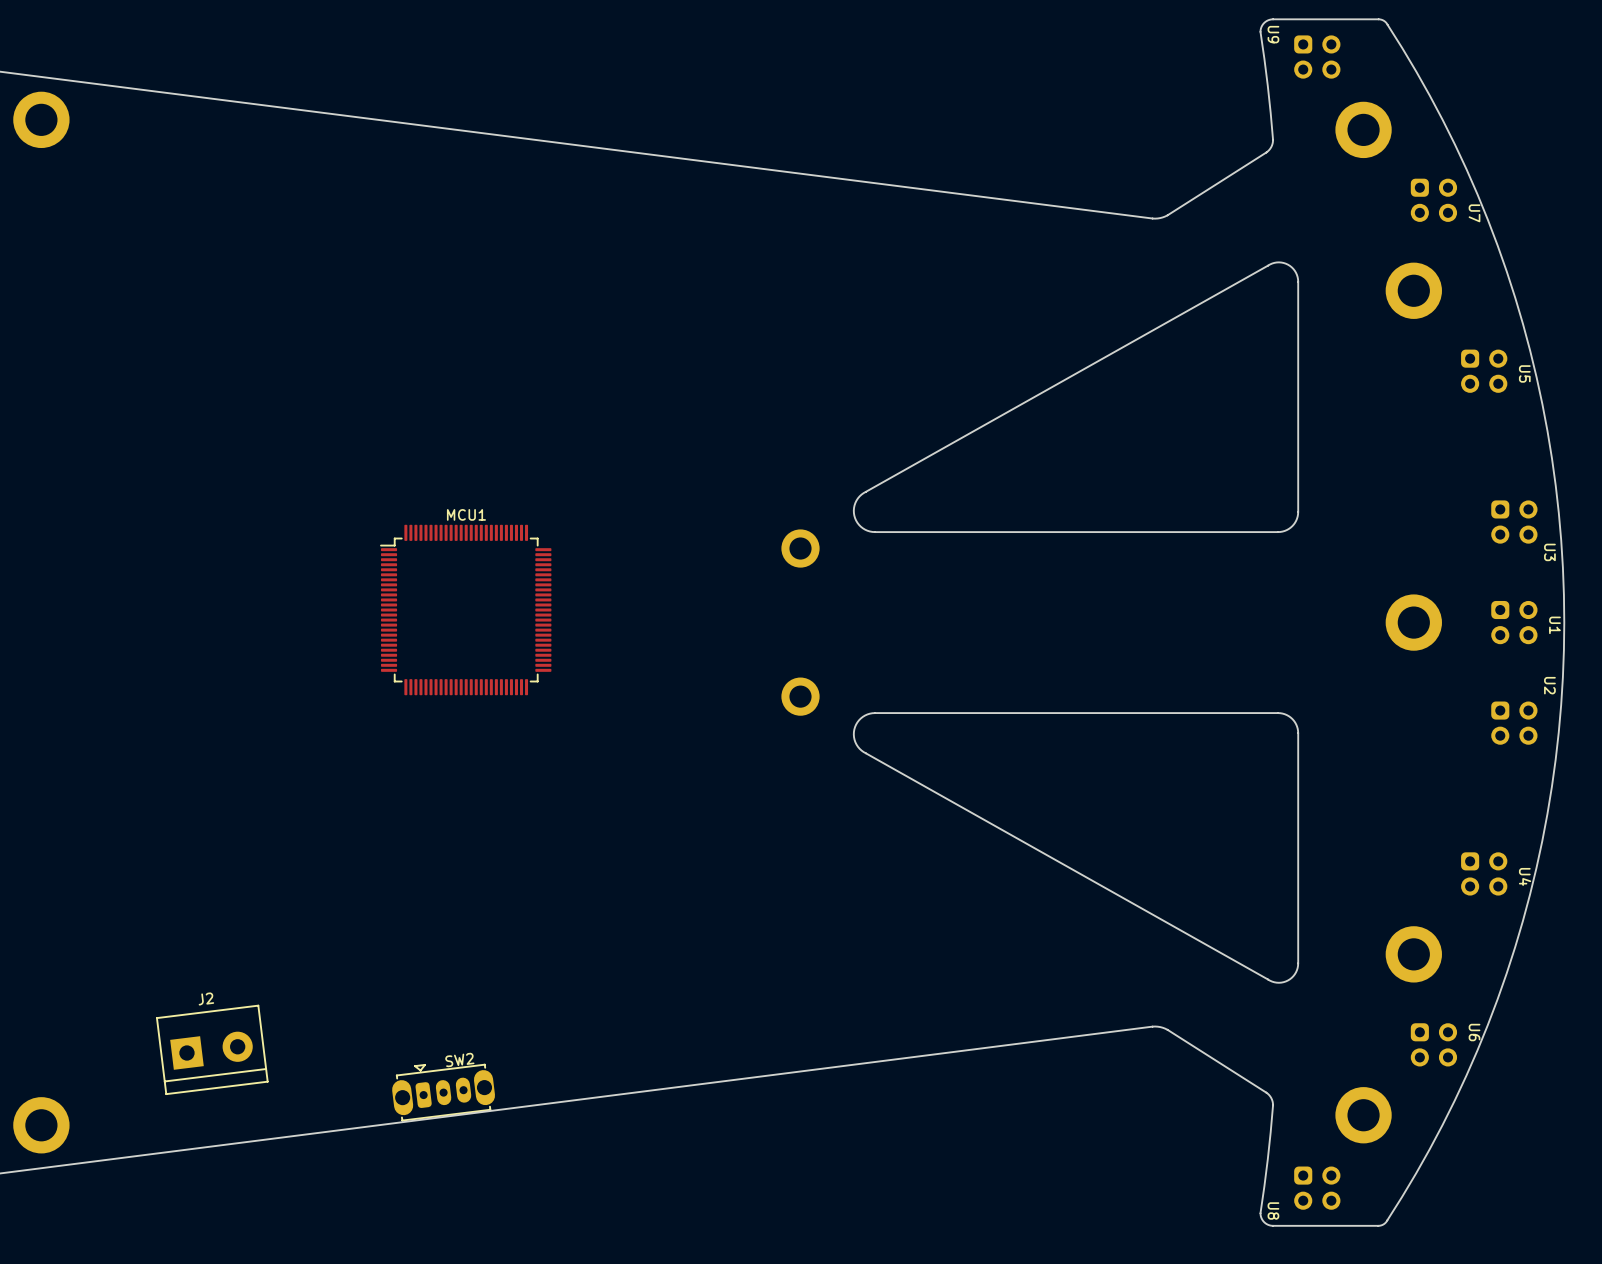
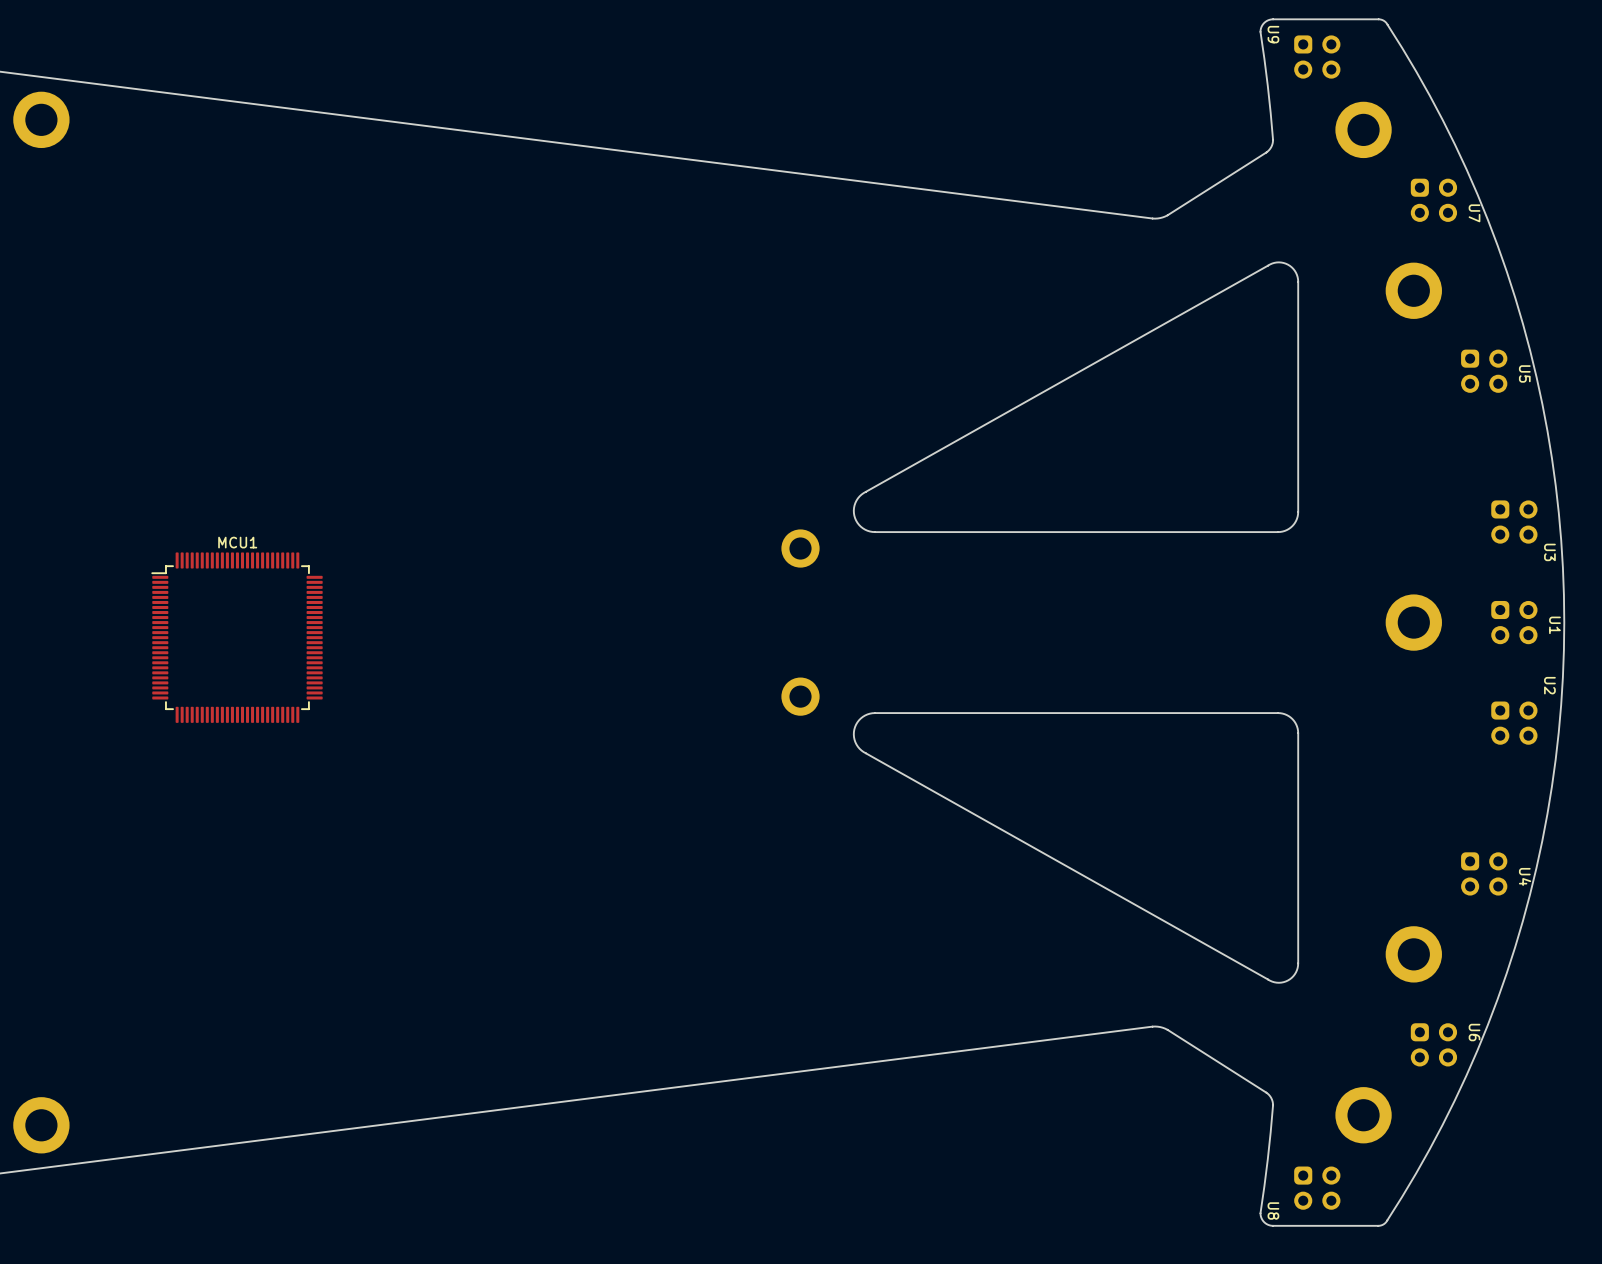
MCU1 position: (465, 610) -> (237, 637)
J2: (212, 1049) -> none
SW2: (443, 1092) -> none

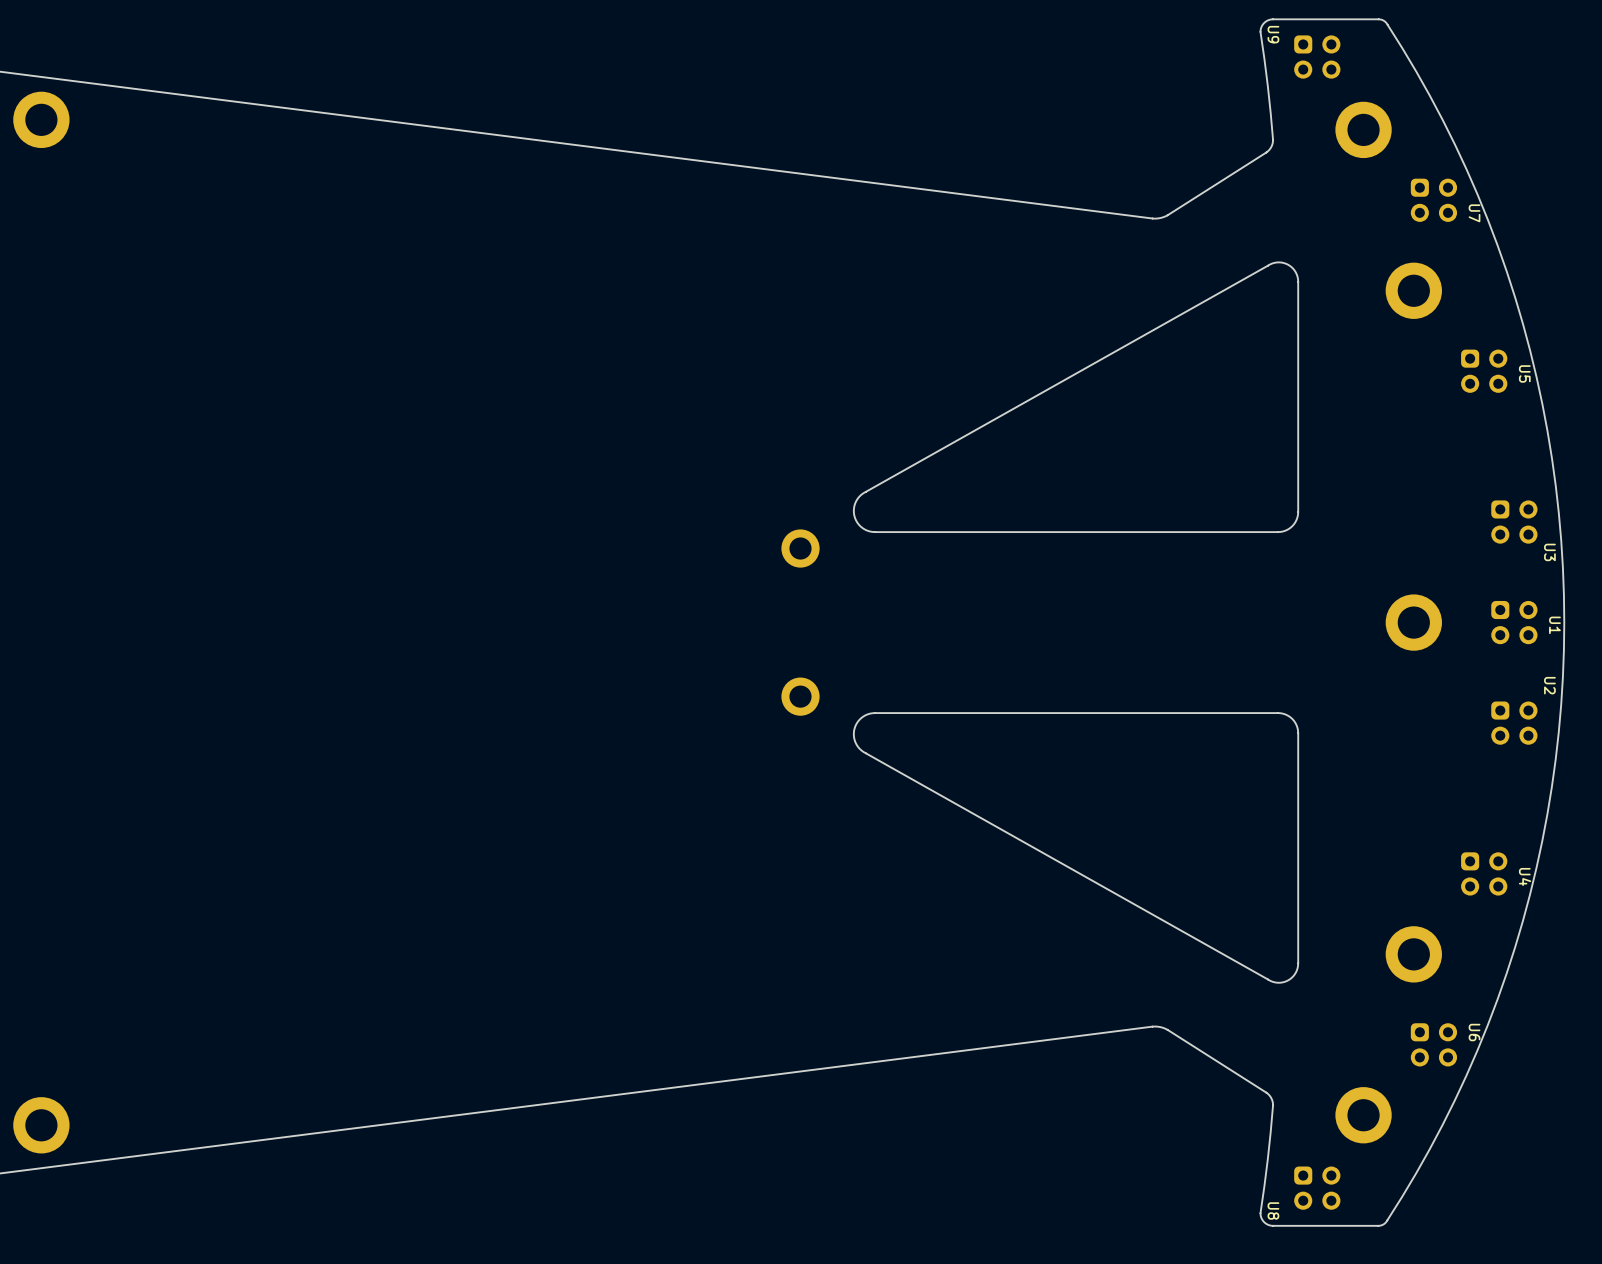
MCU1: (237, 637) -> none

